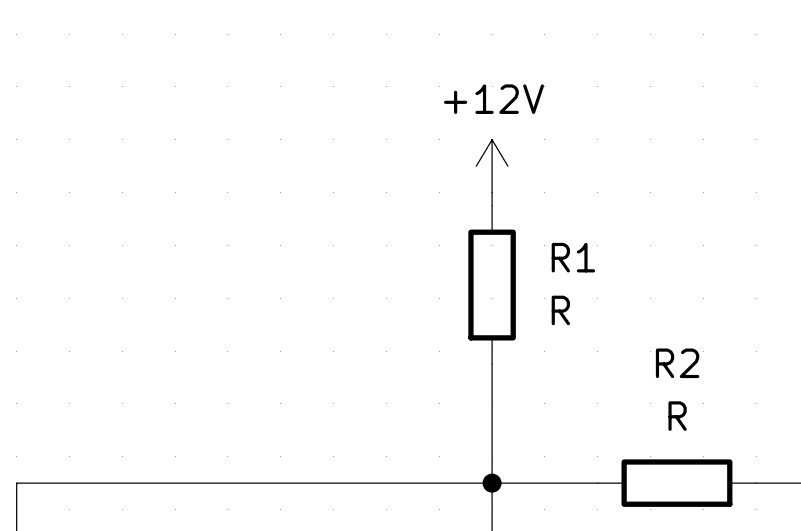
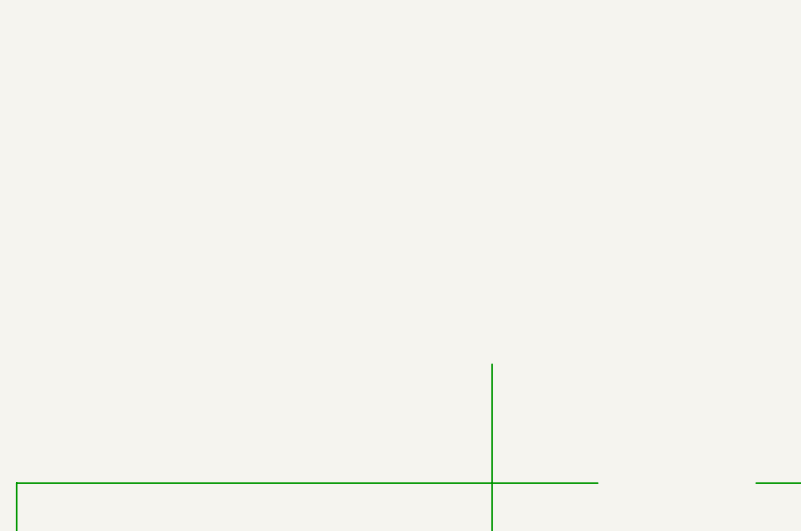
power symbol: +12V (492, 166) -> none
wire: (492, 192) (492, 205) -> none
R1: R (492, 285) -> none
junction: (492, 483) -> none
R2: R (676, 483) -> none

